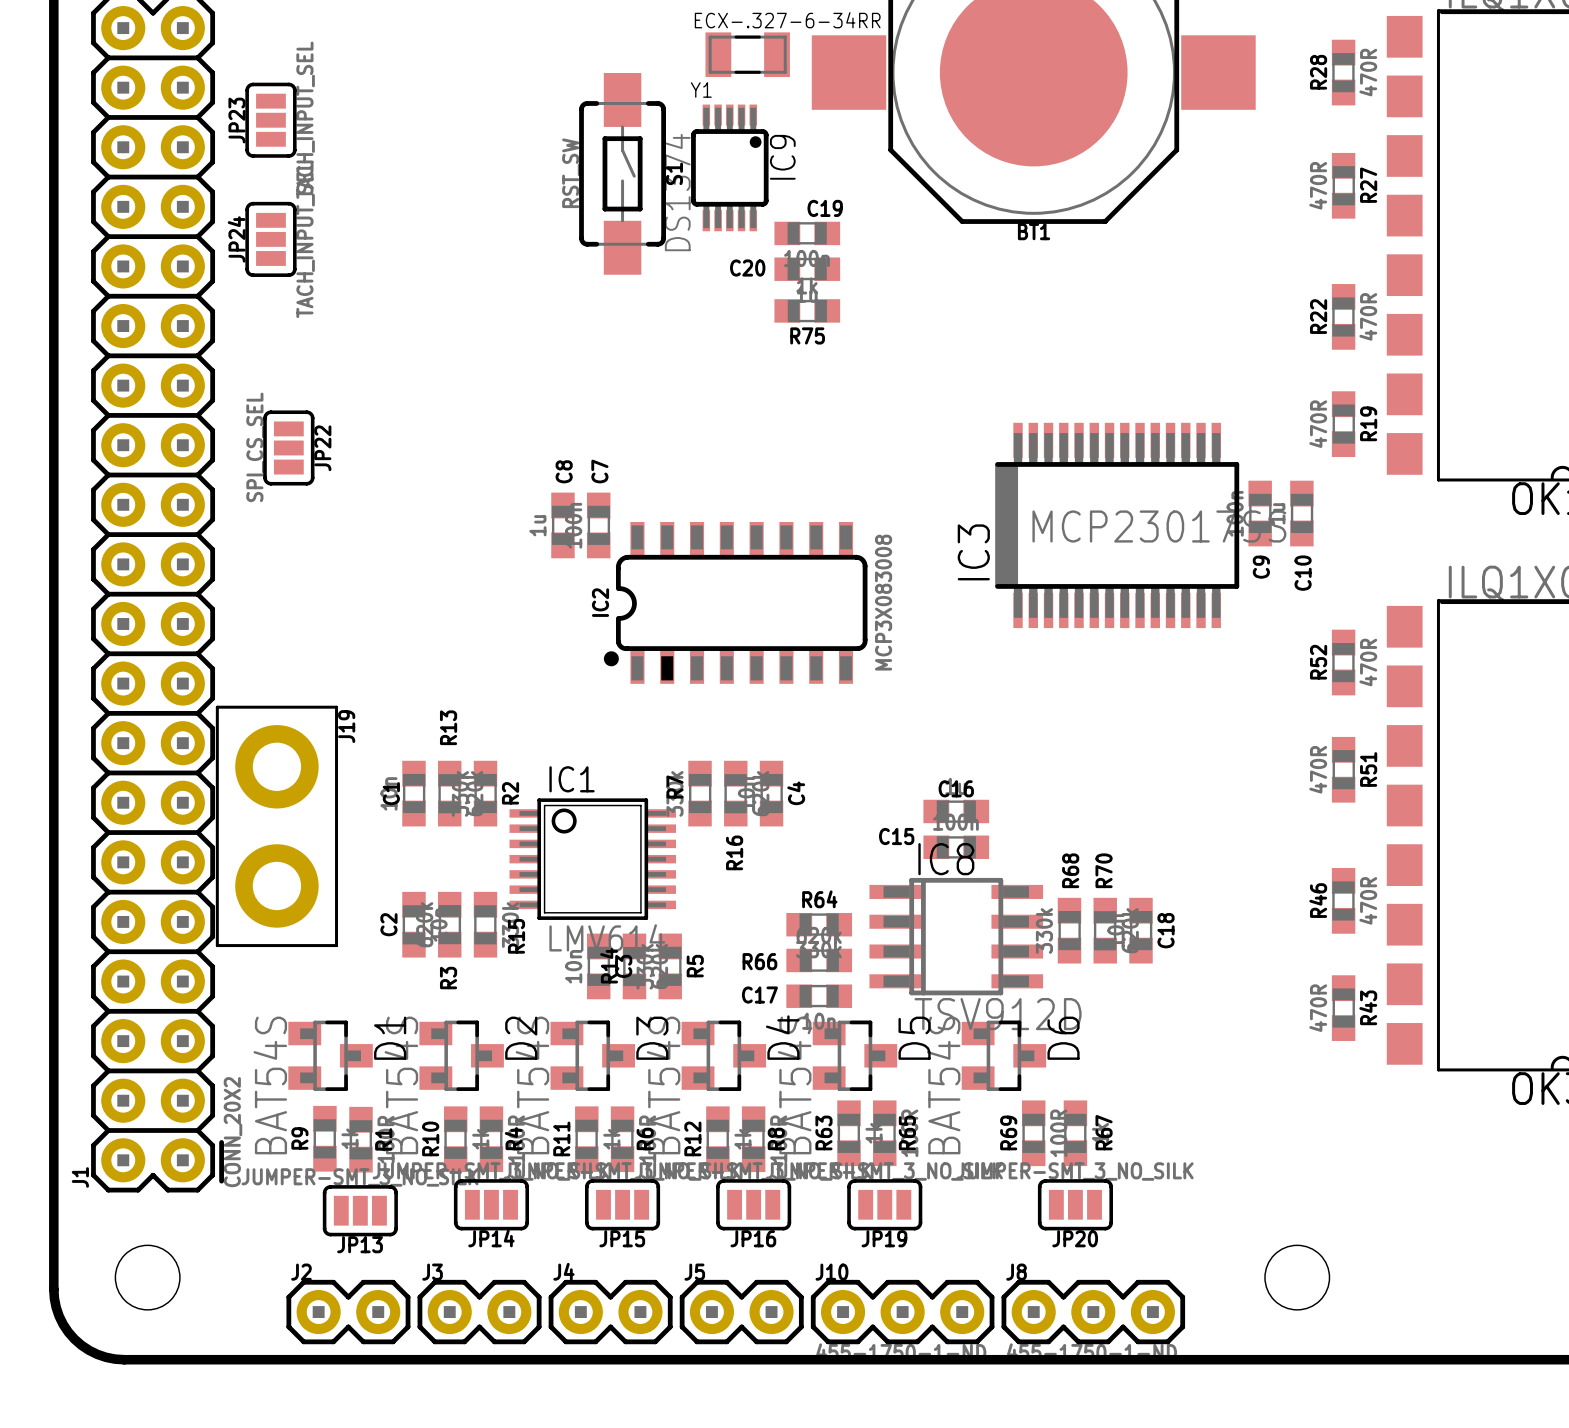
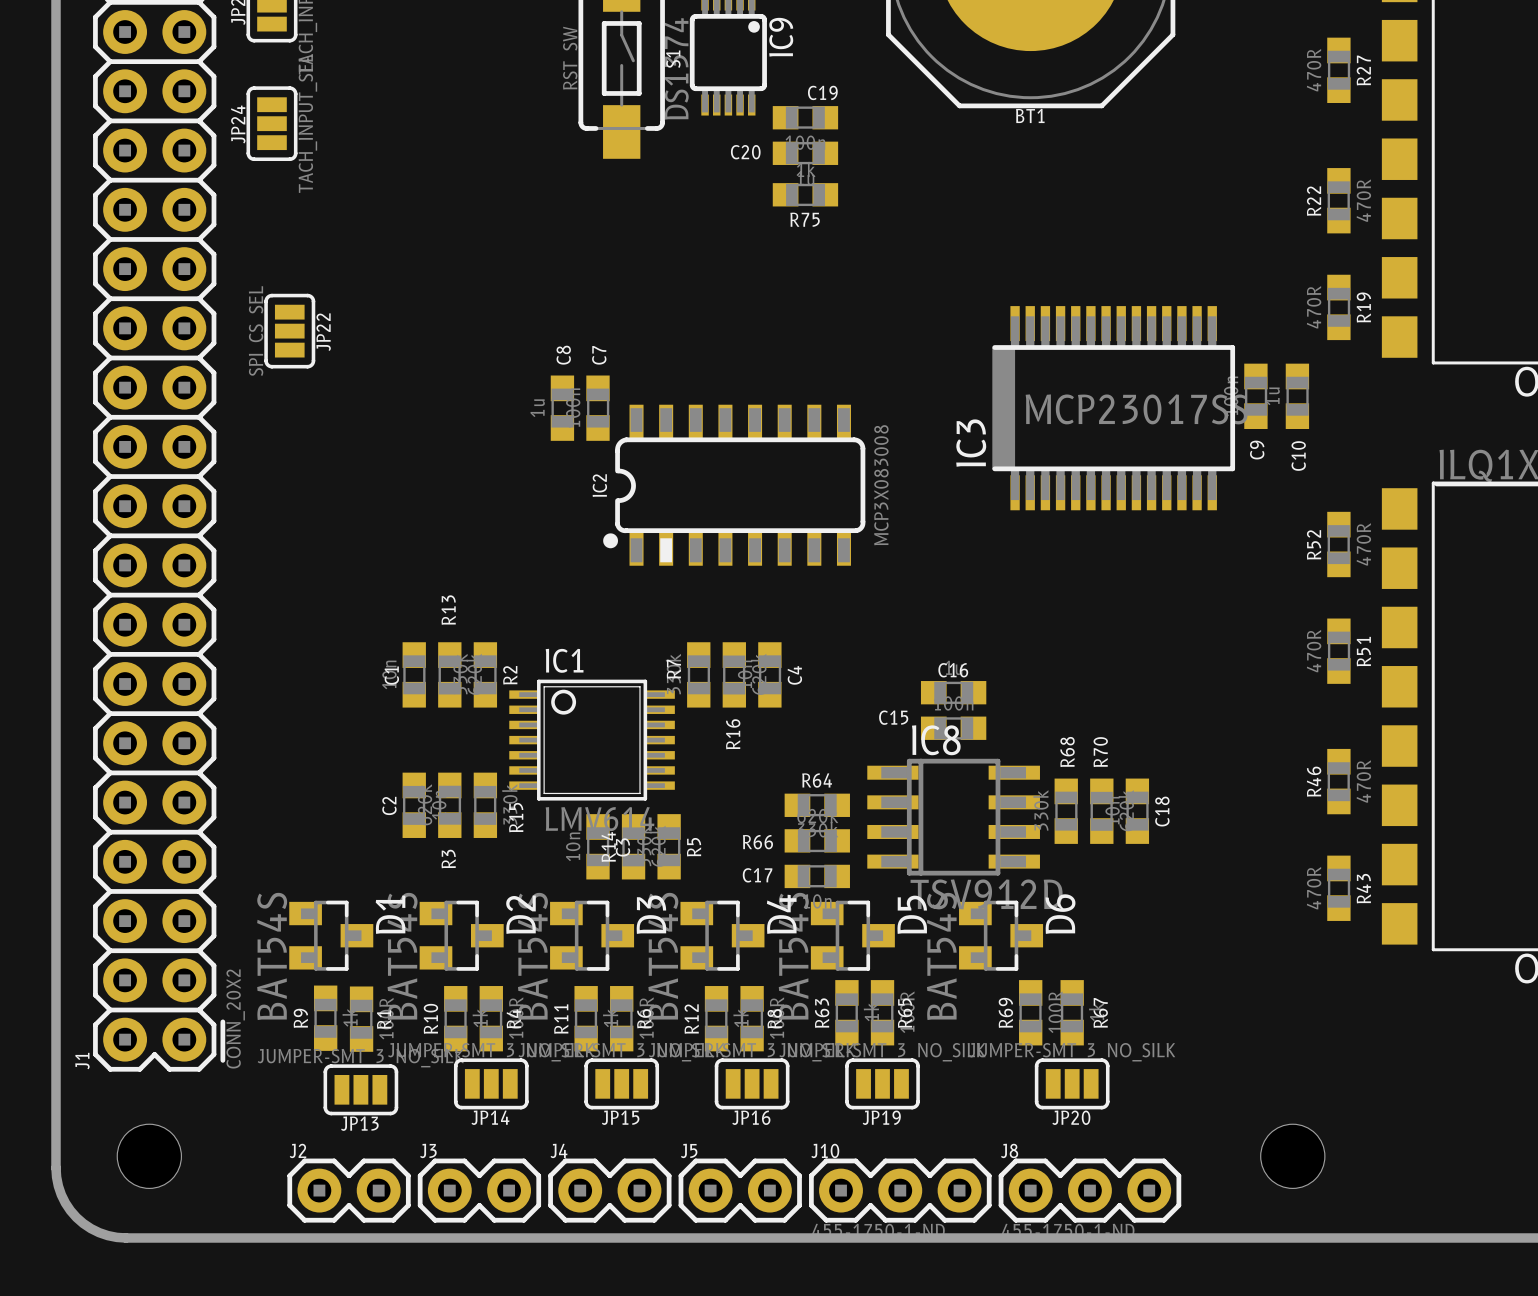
J19: (276, 826) -> none

